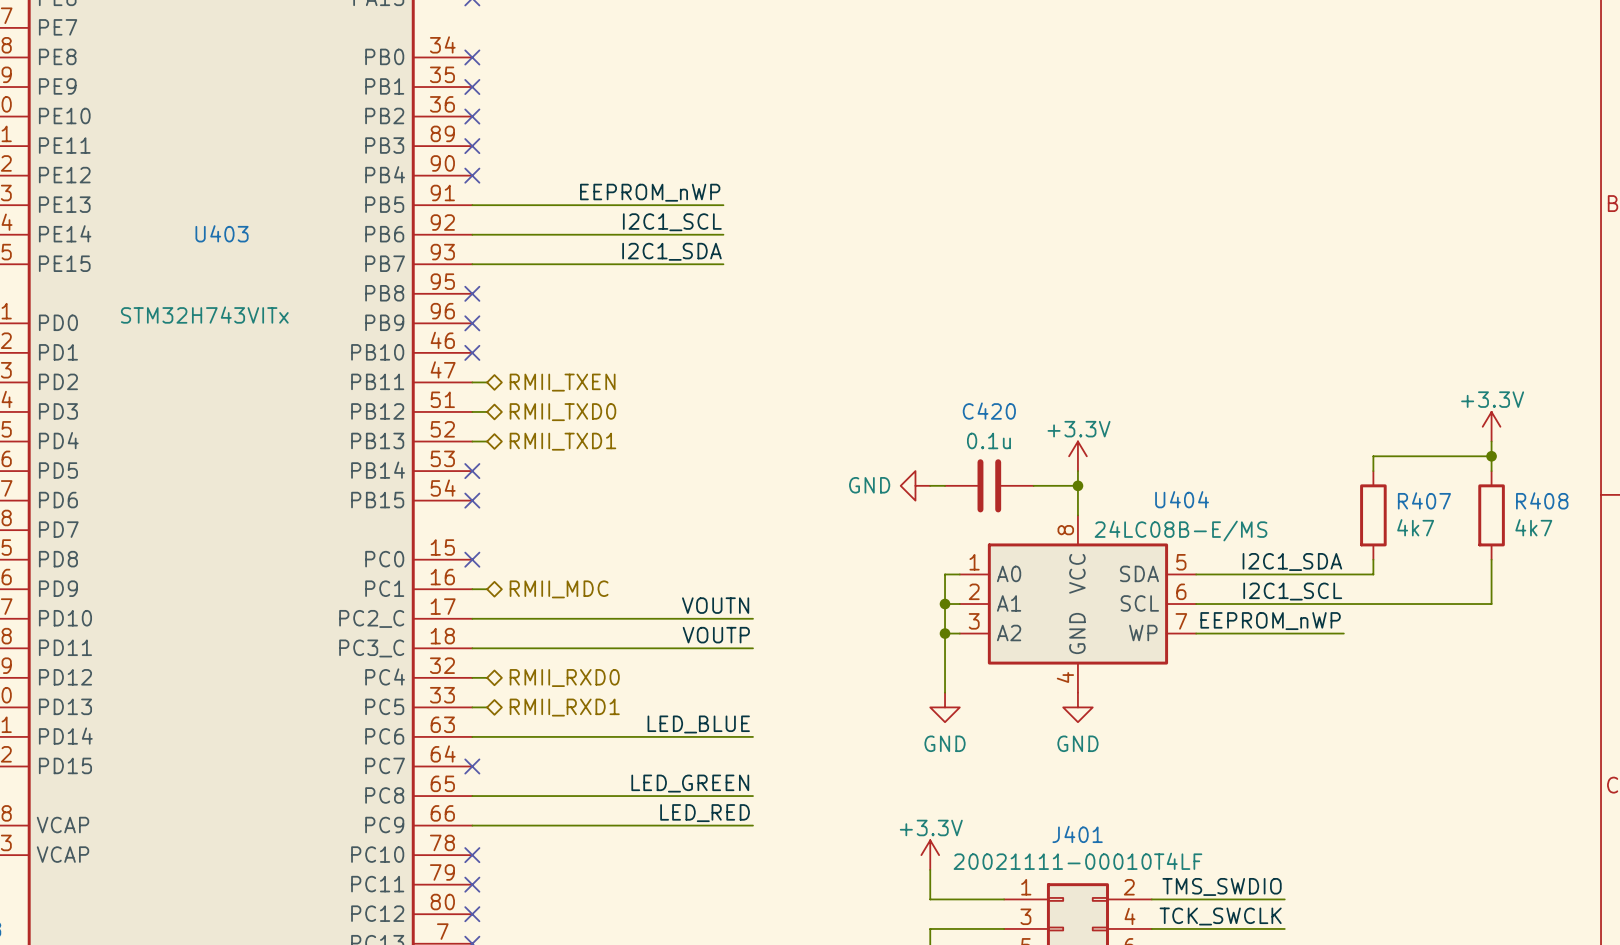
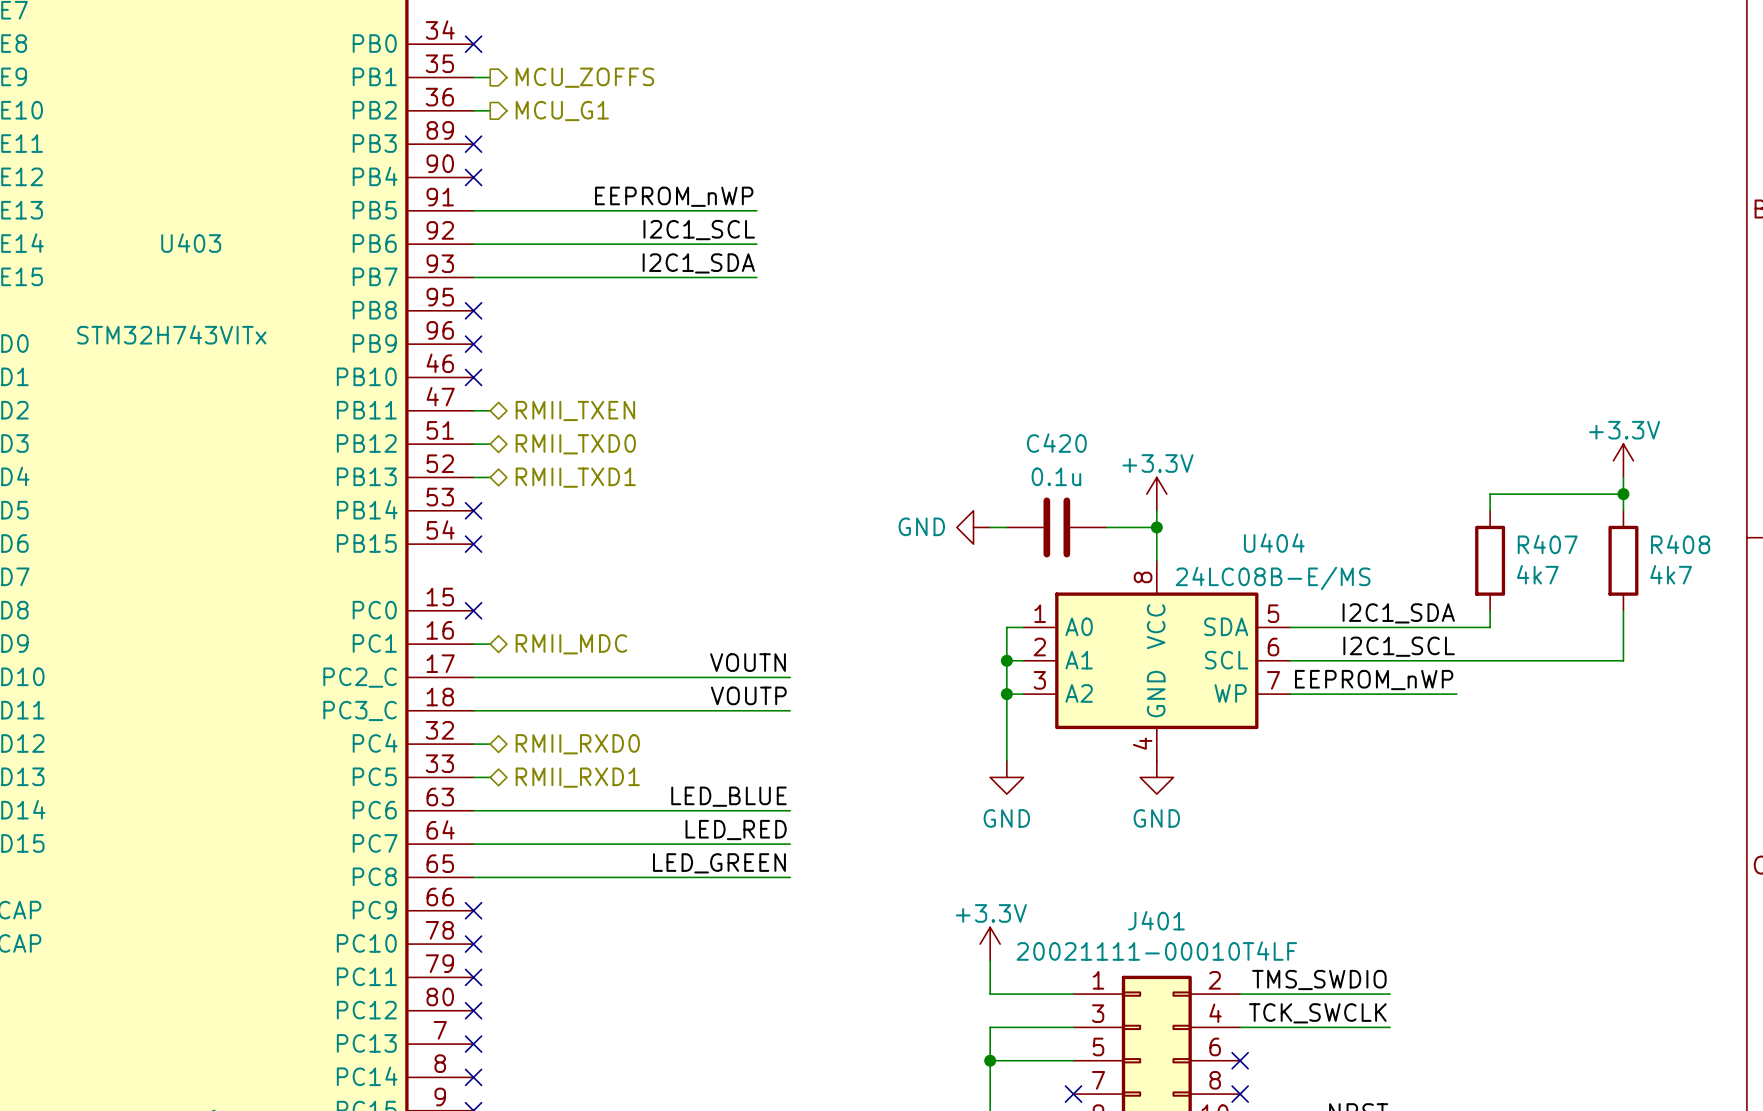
wire: none -> (473, 77) (490, 77)
no-connect mark: (472, 87) -> none
hierarchical label: none -> MCU_ZOFFS (584, 77)
wire: none -> (473, 110) (490, 110)
no-connect mark: (472, 116) -> none
hierarchical label: none -> MCU_G1 (562, 111)
no-connect mark position: (472, 766) -> (473, 910)
label position: LED_RED (705, 813) -> LED_RED (736, 830)
wire: (472, 825) (752, 825) -> (473, 844) (790, 844)

